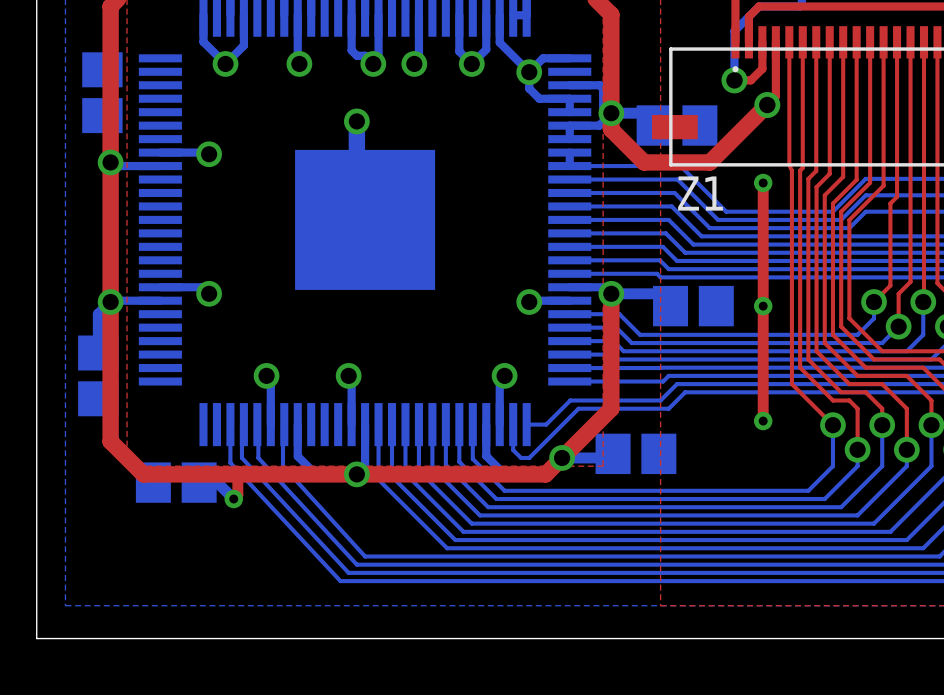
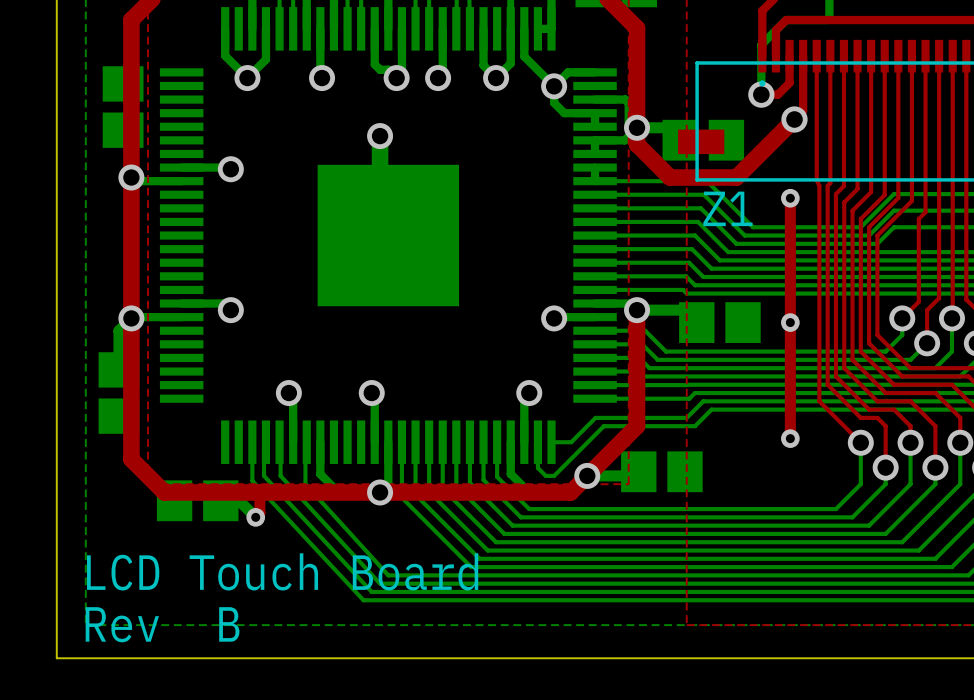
text: none -> LCD Touch Board (282, 571)
text: none -> Rev B (162, 624)

